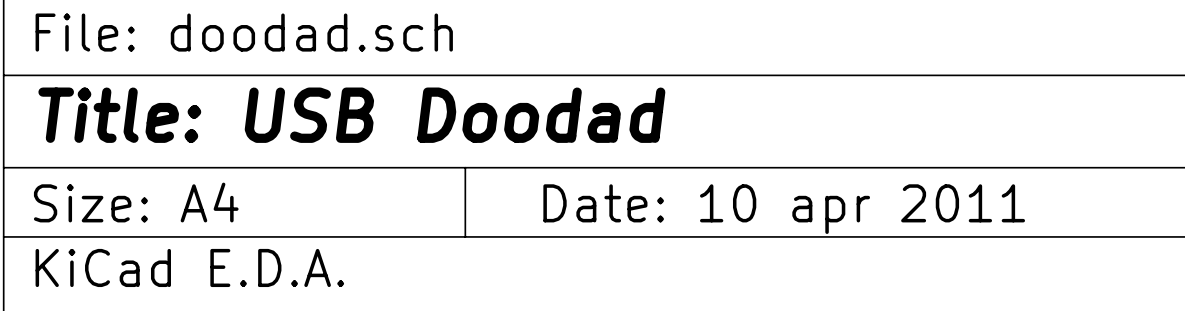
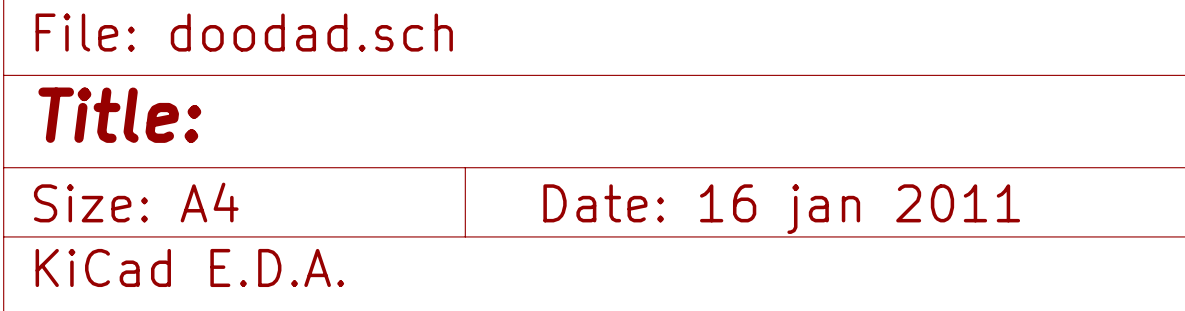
title block: Title: USB Doodad (351, 115) -> Title: (119, 115)
title block: Date: 10 apr 2011 (784, 209) -> Date: 16 jan 2011 (781, 209)

